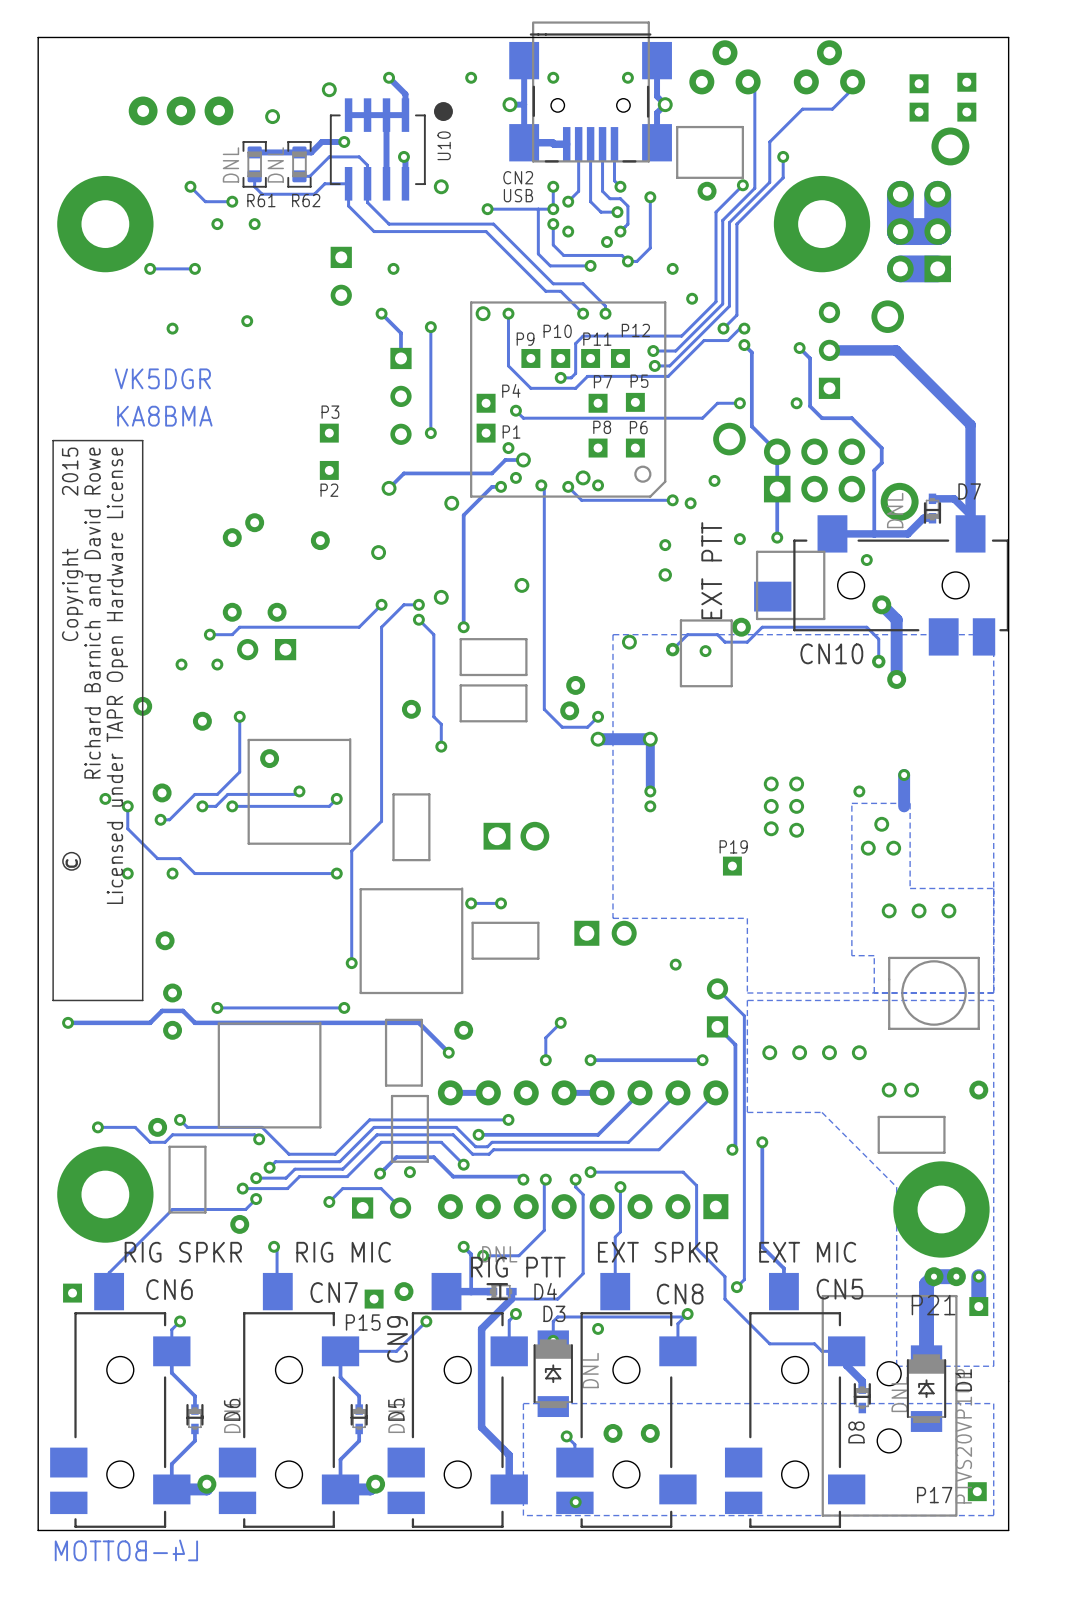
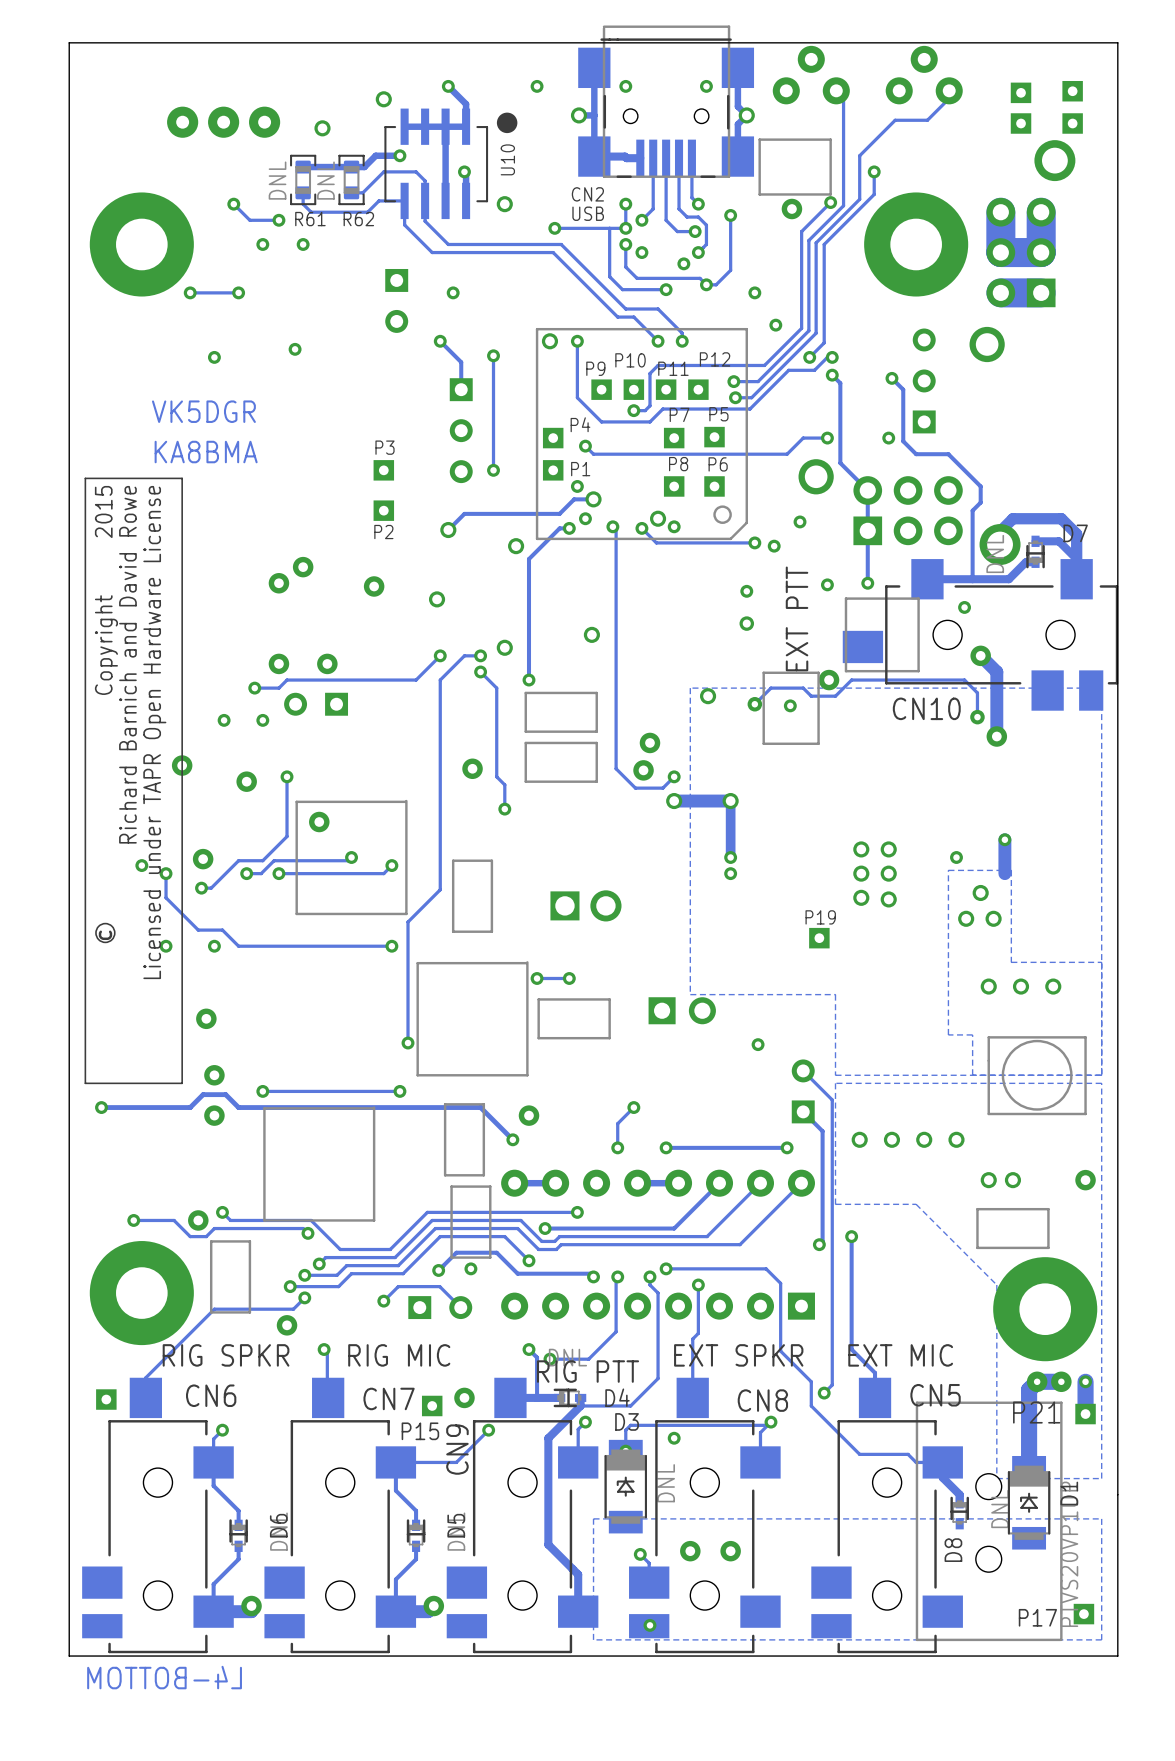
track: (829, 350) (896, 350) (970, 424) (970, 492) -> (1000, 544) (1000, 531) (1012, 518) (1061, 518) (1076, 534)

